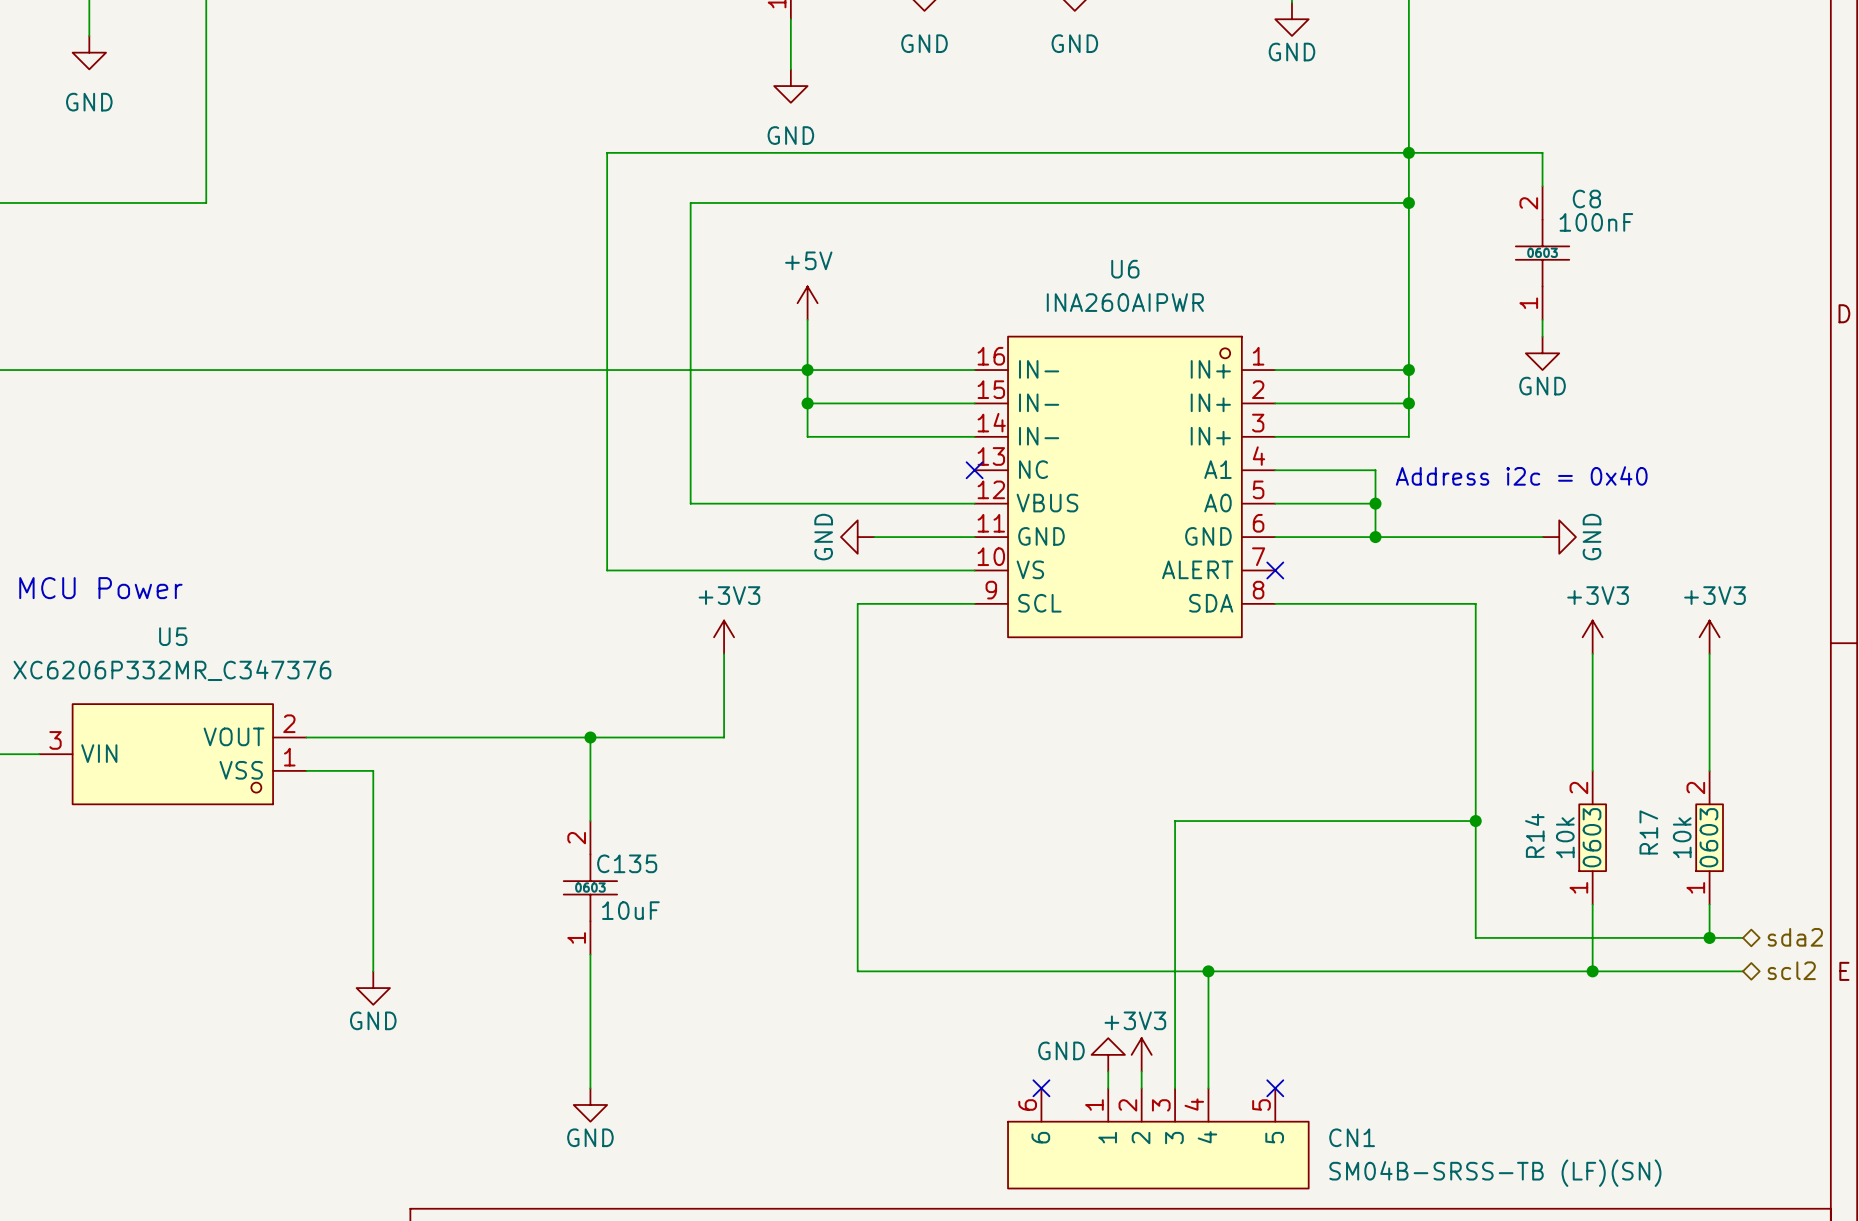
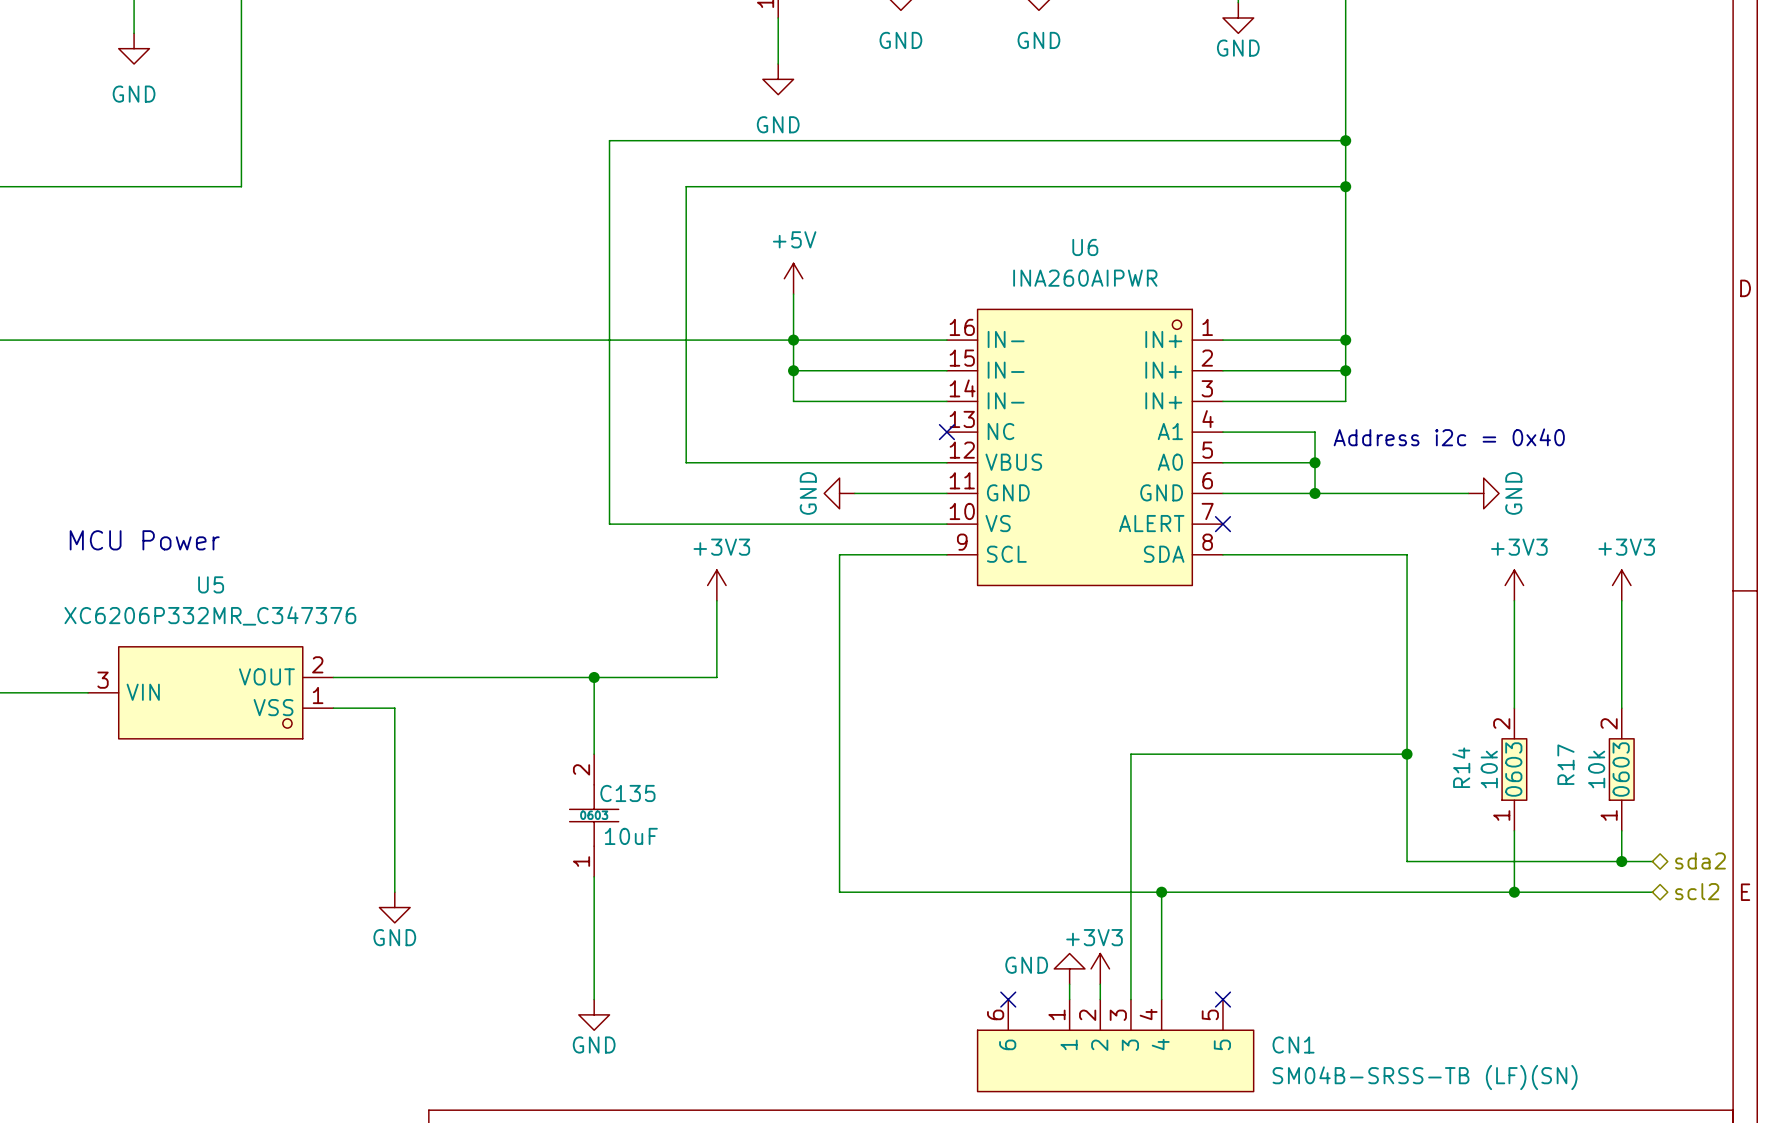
wire: (1408, 152) (1542, 152) (1542, 186) -> none
C8: (1542, 253) -> none
wire: (1542, 319) (1542, 336) -> none
power symbol: GND (1542, 353) -> none

